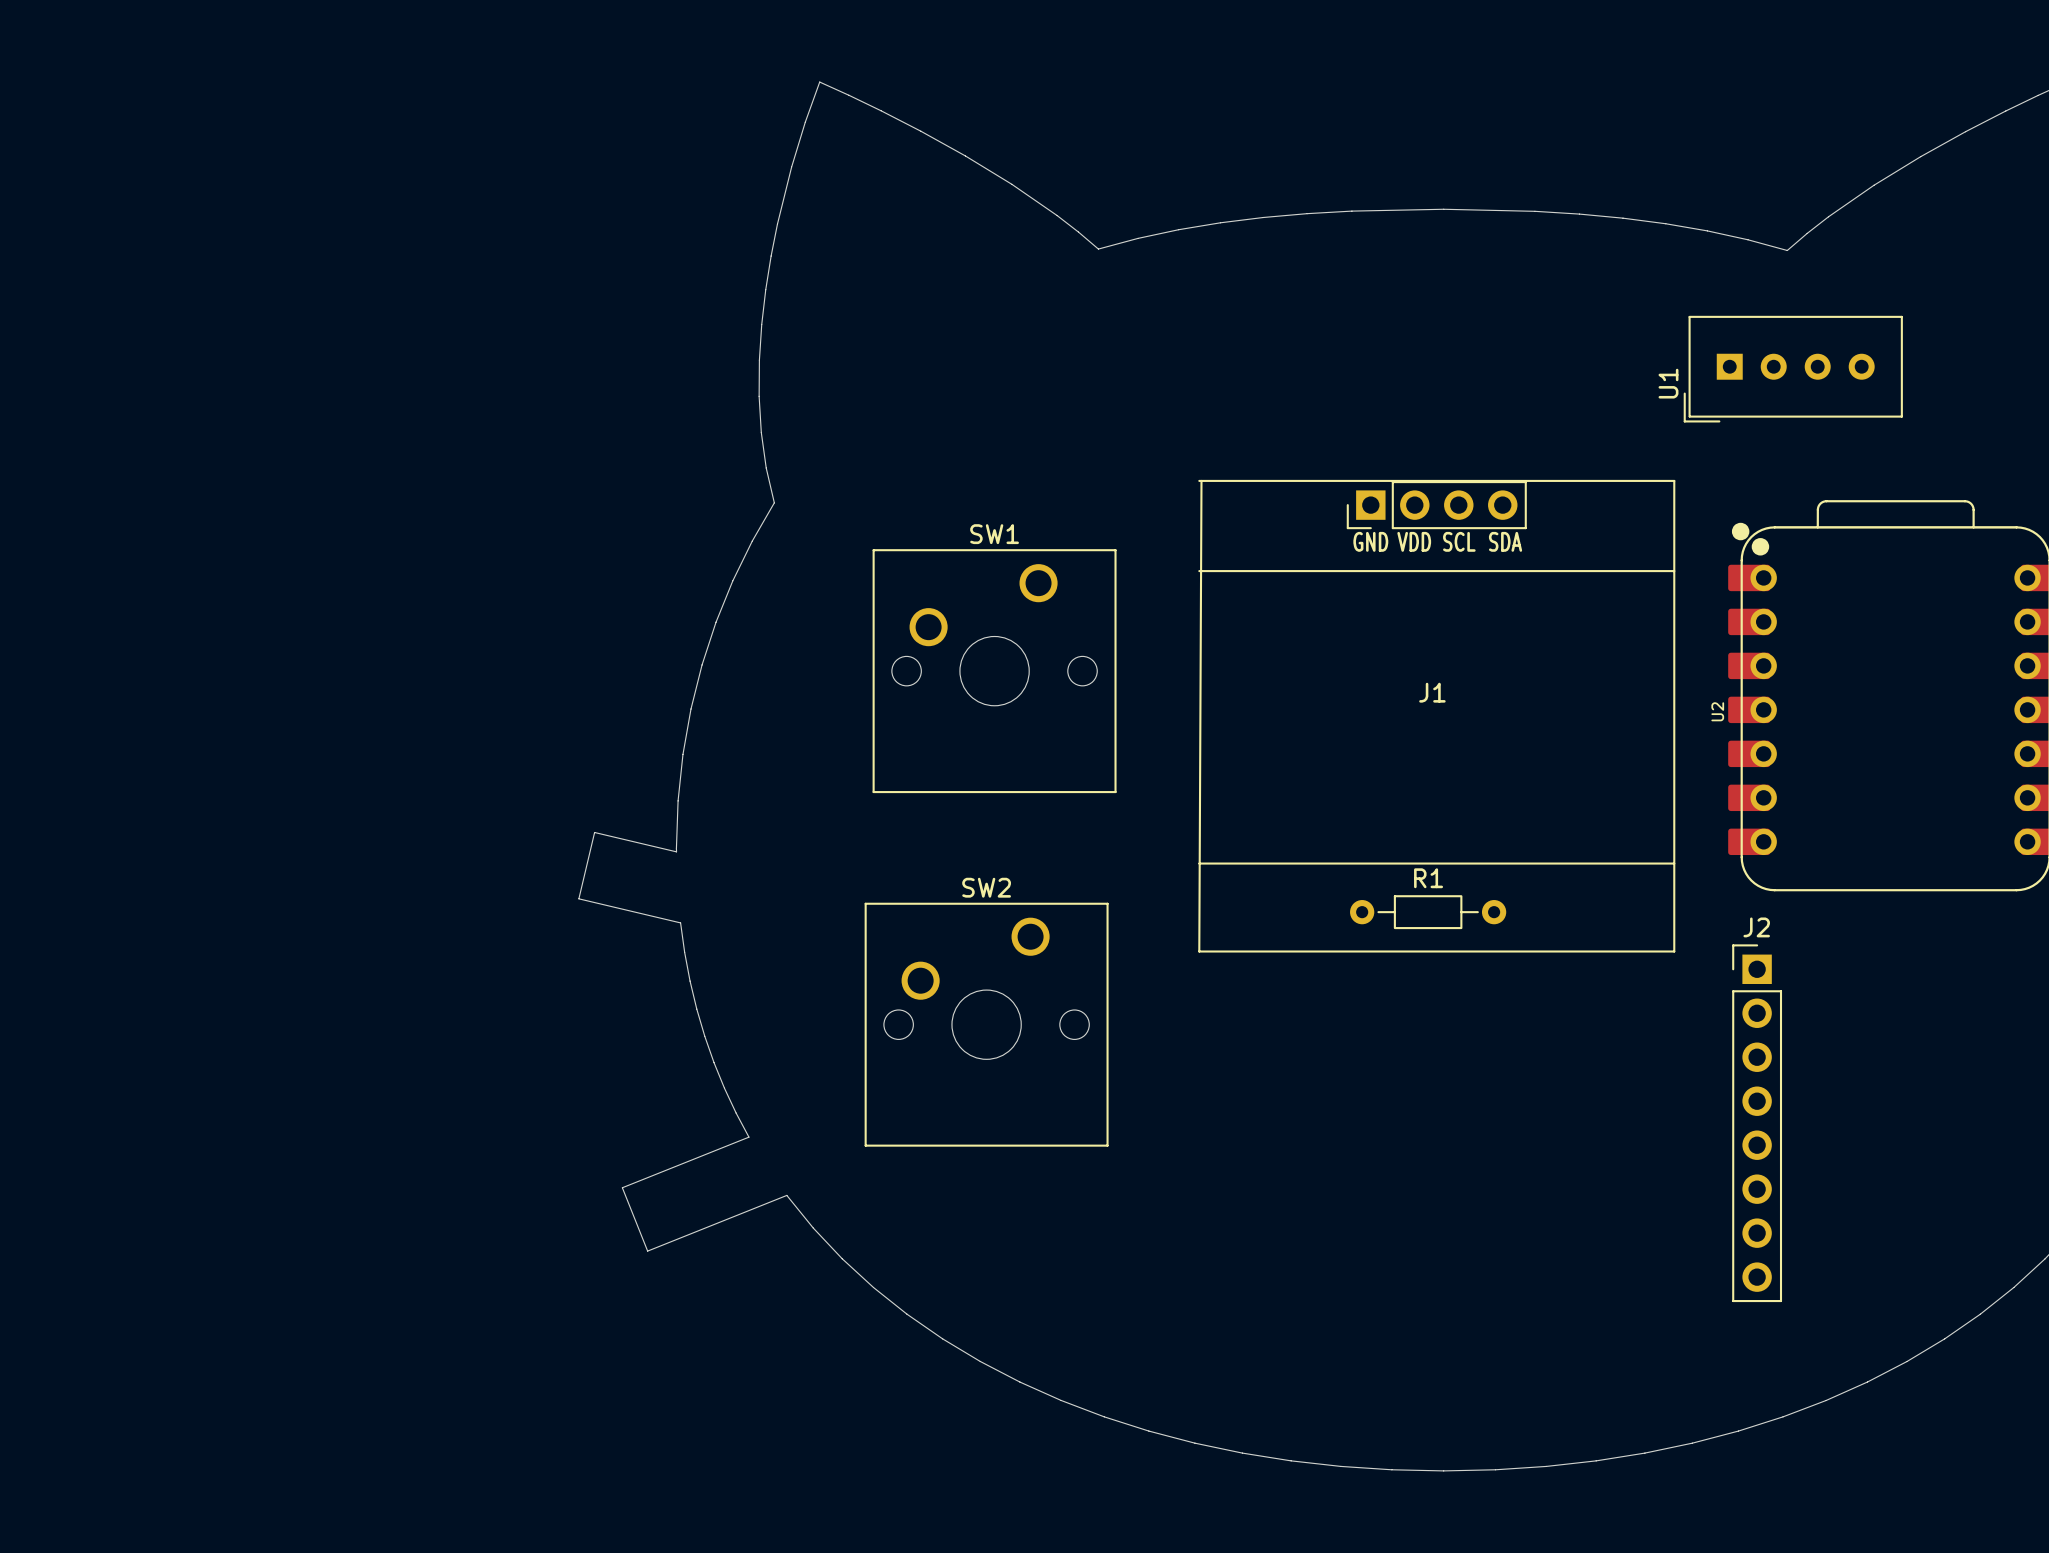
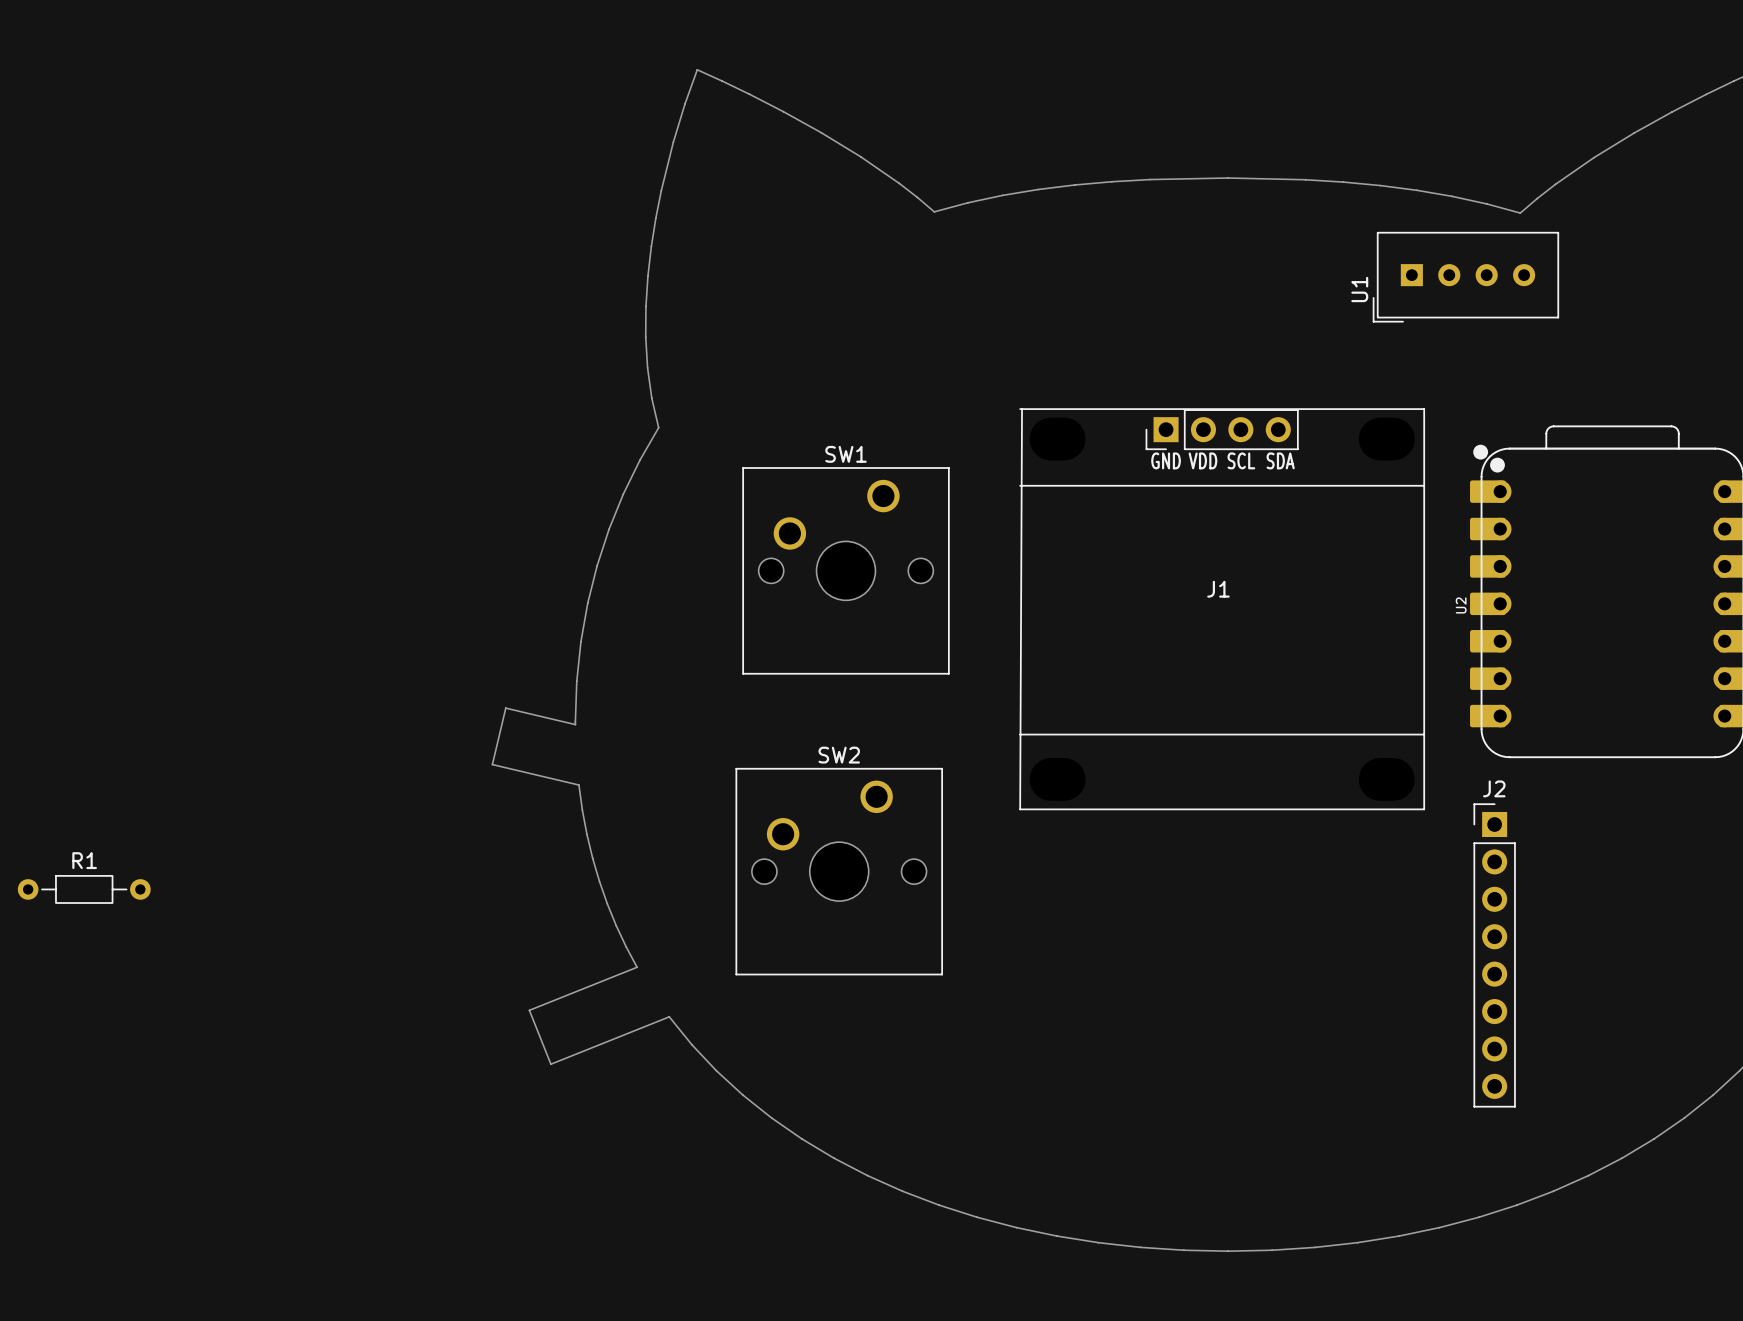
U1 position: (1793, 369) -> (1465, 277)
R1 position: (1428, 912) -> (84, 889)

